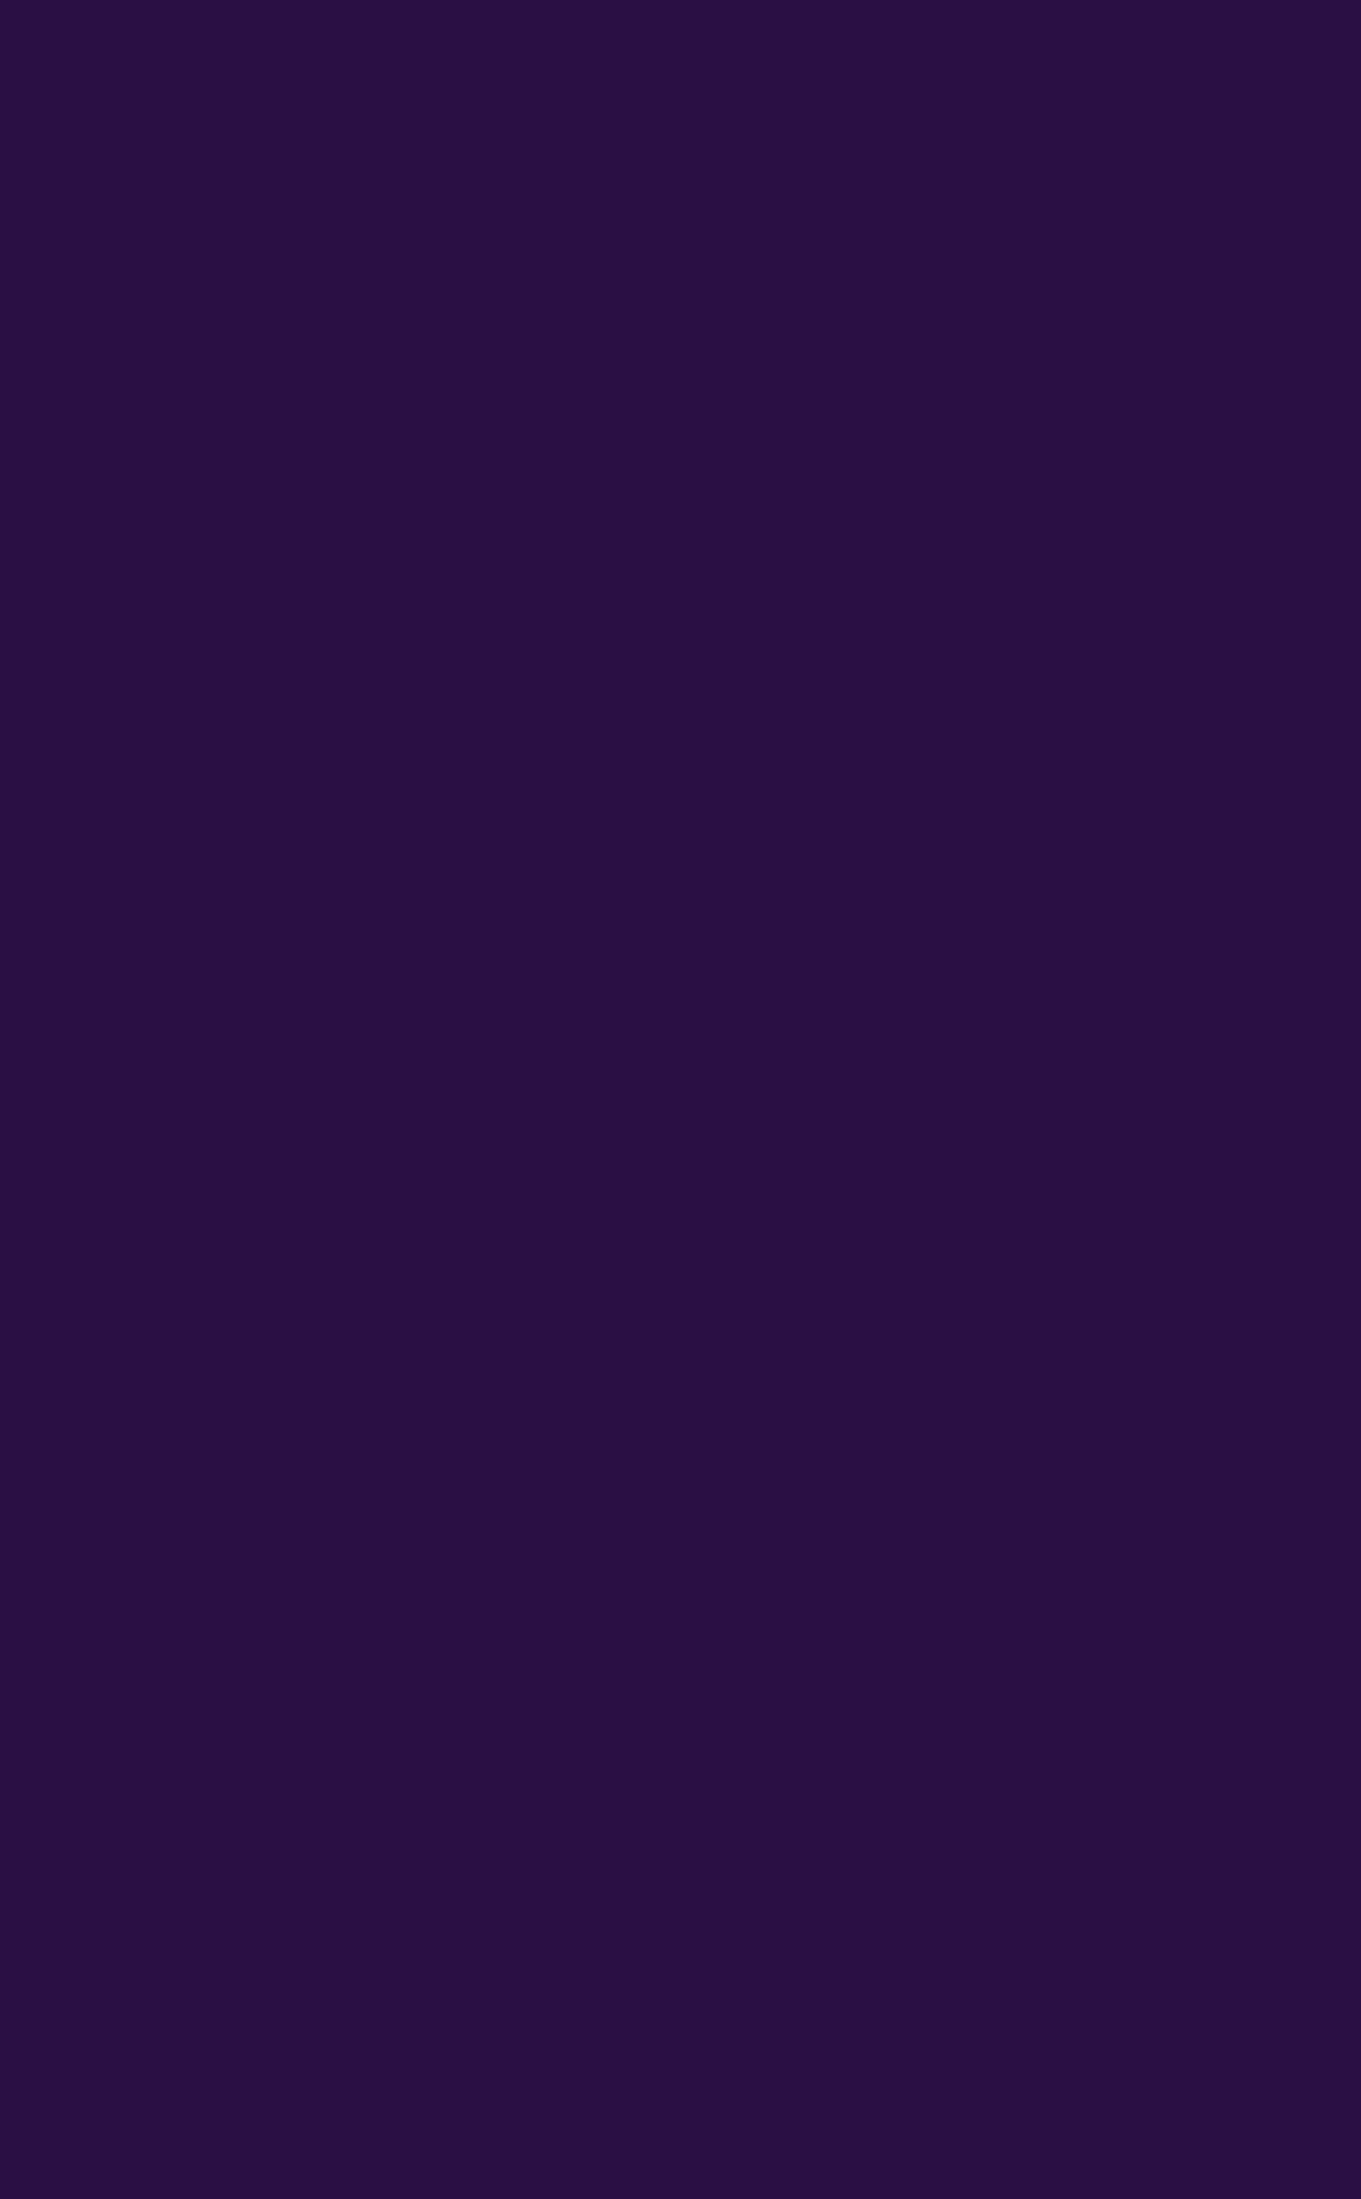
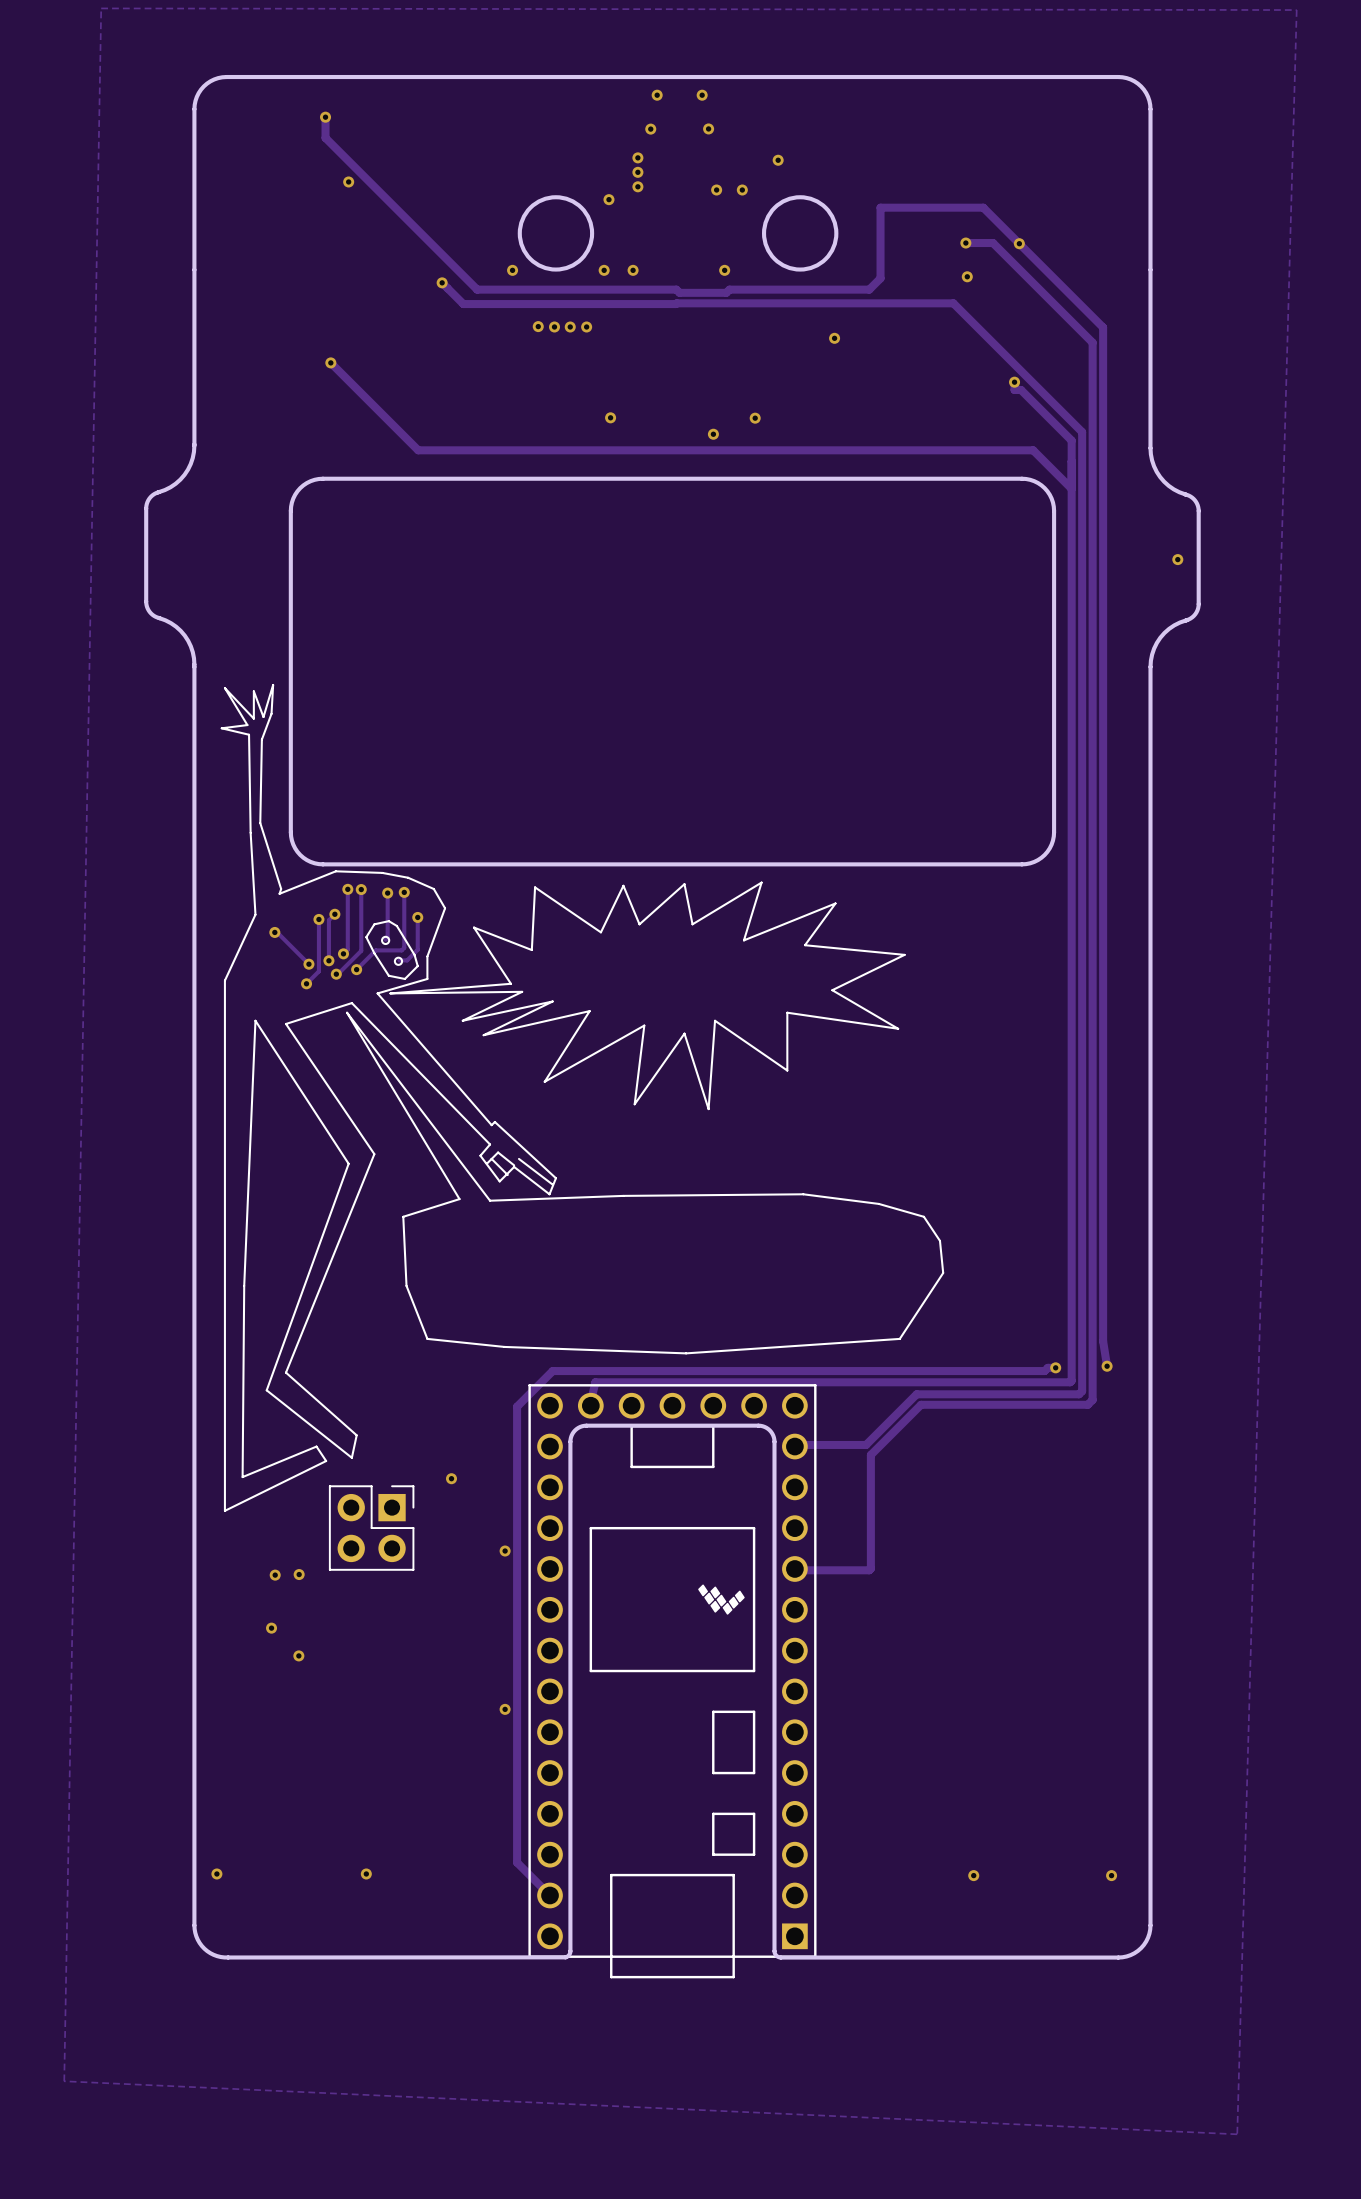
zone outline: none -> (101, 8) (64, 2081) (1237, 2134) (1296, 10) (101, 8)
board edge: none -> (226, 77) (1118, 77) (1134, 81) (1141, 86) (1148, 96) (1150, 109) (1150, 454) (1156, 471) (1164, 481) (1173, 489) (1190, 496) (1197, 505) (1198, 604) (1196, 612) (1192, 617) (1174, 625) (1160, 637) (1152, 654) (1150, 666) (1150, 1925) (1148, 1937) (1143, 1944) (1130, 1955) (1118, 1957) (780, 1957) (775, 1955) (774, 1441) (769, 1430) (758, 1425) (586, 1425) (578, 1427) (571, 1435) (570, 1951) (568, 1955) (565, 1957) (224, 1957) (210, 1953) (197, 1939) (194, 1925) (194, 664) (192, 652) (184, 635) (171, 623) (152, 614) (147, 607) (146, 508) (148, 500) (152, 495) (170, 487) (184, 474) (190, 463) (193, 451) (194, 104) (198, 93) (206, 83) (214, 79) (226, 77)
via: none -> (657, 95)
via: none -> (702, 95)
track: none -> (325, 117) (325, 137) (477, 289) (676, 289) (679, 292) (726, 292) (729, 289) (869, 289) (880, 278) (880, 207) (983, 207) (1103, 327) (1103, 1341) (1107, 1366)
via: none -> (325, 117)
via: none -> (708, 128)
via: none -> (650, 129)
via: none -> (637, 157)
via: none -> (778, 160)
via: none -> (637, 172)
via: none -> (348, 181)
via: none -> (637, 186)
via: none -> (716, 190)
via: none -> (742, 190)
round board edge: none -> [517, 195, 595, 272]
round board edge: none -> [761, 195, 839, 272]
via: none -> (608, 199)
track: none -> (965, 243) (993, 243) (1092, 342) (1092, 1399) (1087, 1404) (921, 1404) (870, 1454) (870, 1568) (869, 1570) (793, 1570)
via: none -> (965, 243)
via: none -> (1019, 243)
via: none -> (512, 270)
via: none -> (604, 270)
via: none -> (633, 270)
via: none -> (724, 270)
via: none -> (967, 276)
track: none -> (442, 282) (463, 304) (953, 303) (1082, 432) (1082, 1391) (1079, 1394) (916, 1394) (866, 1444) (795, 1444)
via: none -> (442, 282)
via: none -> (538, 326)
via: none -> (554, 326)
via: none -> (570, 326)
via: none -> (586, 326)
via: none -> (834, 338)
track: none -> (330, 362) (418, 450) (1033, 450) (1071, 488)
via: none -> (330, 362)
track: none -> (1014, 382) (1014, 389) (1021, 389) (1071, 440) (1071, 1380) (1070, 1382) (595, 1382) (589, 1406)
via: none -> (1014, 382)
via: none -> (610, 417)
via: none -> (755, 418)
via: none -> (713, 434)
board edge: none -> (322, 478) (1021, 478) (1038, 483) (1049, 494) (1054, 510) (1054, 832) (1049, 848) (1038, 860) (1021, 864) (322, 864) (306, 860) (295, 848) (290, 832) (290, 510) (293, 498) (300, 488) (310, 481) (322, 478)
via: none -> (1177, 559)
line: none -> (273, 684) (263, 717) (253, 691) (253, 718) (224, 688) (247, 725) (221, 728) (249, 734) (250, 832) (255, 914) (224, 980) (224, 1510) (326, 1461) (316, 1446) (242, 1477) (244, 1285) (255, 1020) (348, 1163) (266, 1390) (351, 1457) (356, 1435) (285, 1372) (374, 1154) (285, 1023) (351, 1003) (490, 1144) (480, 1155) (499, 1181) (514, 1166) (549, 1194) (555, 1178) (494, 1121) (491, 1125) (377, 993) (427, 978) (427, 956) (445, 908) (433, 888) (408, 877) (382, 872) (335, 871) (279, 893) (281, 888) (260, 823) (261, 739) (271, 713) (273, 684)
line: none -> (761, 882) (743, 940) (835, 903) (805, 945) (904, 954) (832, 990) (898, 1028) (787, 1012) (787, 1070) (715, 1020) (708, 1109) (684, 1033) (634, 1104) (644, 1025) (544, 1081) (589, 1011) (483, 1035) (552, 1001) (462, 1020) (522, 991) (390, 993) (510, 983) (473, 927) (531, 950) (535, 887) (600, 932) (623, 885) (639, 924) (684, 884) (692, 924) (761, 882)
track: none -> (347, 889) (347, 949) (343, 953)
via: none -> (347, 889)
track: none -> (361, 889) (361, 950) (336, 974)
via: none -> (361, 889)
track: none -> (404, 892) (404, 947) (401, 950) (375, 950) (356, 969)
via: none -> (404, 892)
track: none -> (387, 893) (387, 937) (385, 939)
via: none -> (387, 893)
track: none -> (334, 914) (328, 920) (328, 960)
via: none -> (334, 914)
track: none -> (417, 917) (417, 949) (407, 960) (399, 960)
via: none -> (417, 917)
track: none -> (318, 919) (318, 971) (306, 983)
via: none -> (318, 919)
line: none -> (388, 921) (396, 925) (414, 954) (417, 966) (404, 978) (388, 975) (366, 937) (374, 924) (388, 921)
track: none -> (274, 932) (277, 932) (308, 964)
via: none -> (274, 932)
drawing: none -> [381, 935, 404, 966]
via: none -> (343, 953)
via: none -> (328, 960)
via: none -> (308, 964)
via: none -> (356, 969)
via: none -> (336, 974)
via: none -> (306, 983)
line: none -> (347, 1012) (459, 1199) (403, 1216) (406, 1285) (427, 1338) (504, 1346) (686, 1353) (899, 1338) (943, 1273) (939, 1240) (923, 1216) (878, 1203) (803, 1194) (623, 1195) (490, 1200) (347, 1012)
line: none -> (491, 1158) (507, 1175)
line: none -> (518, 1158) (552, 1184)
line: none -> (486, 1163) (498, 1152) (514, 1165)
via: none -> (1107, 1366)
track: none -> (1055, 1367) (1047, 1367) (1044, 1371) (552, 1371) (517, 1406) (517, 1862) (550, 1895)
via: none -> (1055, 1367)
via: none -> (451, 1478)
part: none -> (371, 1528)
via: none -> (505, 1551)
via: none -> (299, 1574)
via: none -> (275, 1575)
via: none -> (271, 1628)
via: none -> (298, 1655)
part: none -> (672, 1681)
via: none -> (505, 1709)
via: none -> (216, 1873)
via: none -> (366, 1873)
via: none -> (973, 1875)
via: none -> (1111, 1875)

